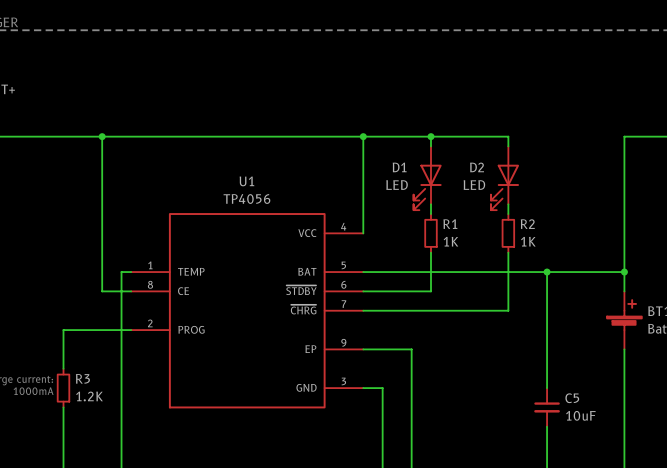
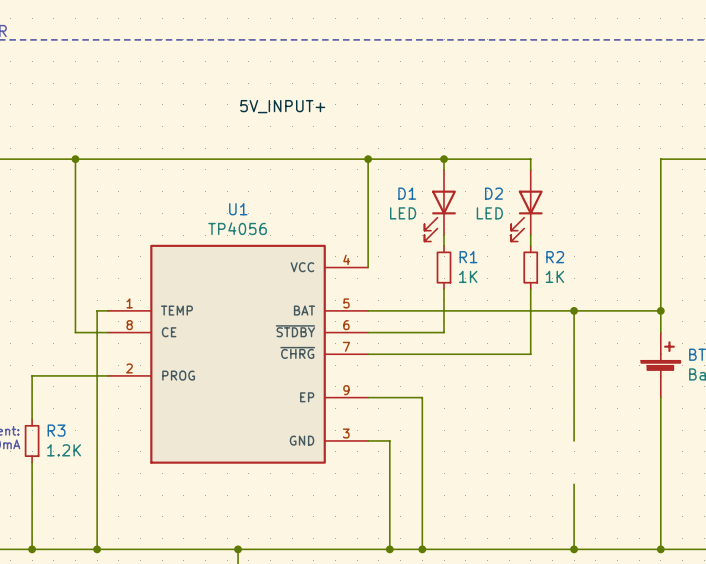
label: none -> 5V_INPUT+ (282, 106)
C5: 10uF (547, 407) -> none

